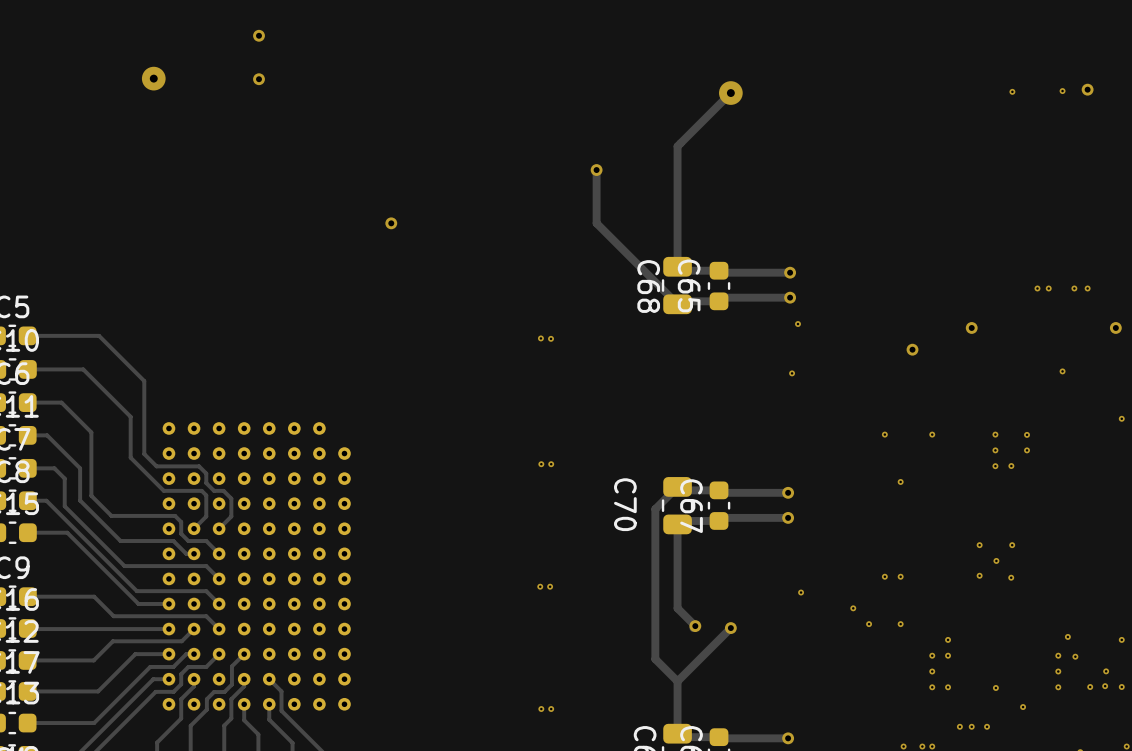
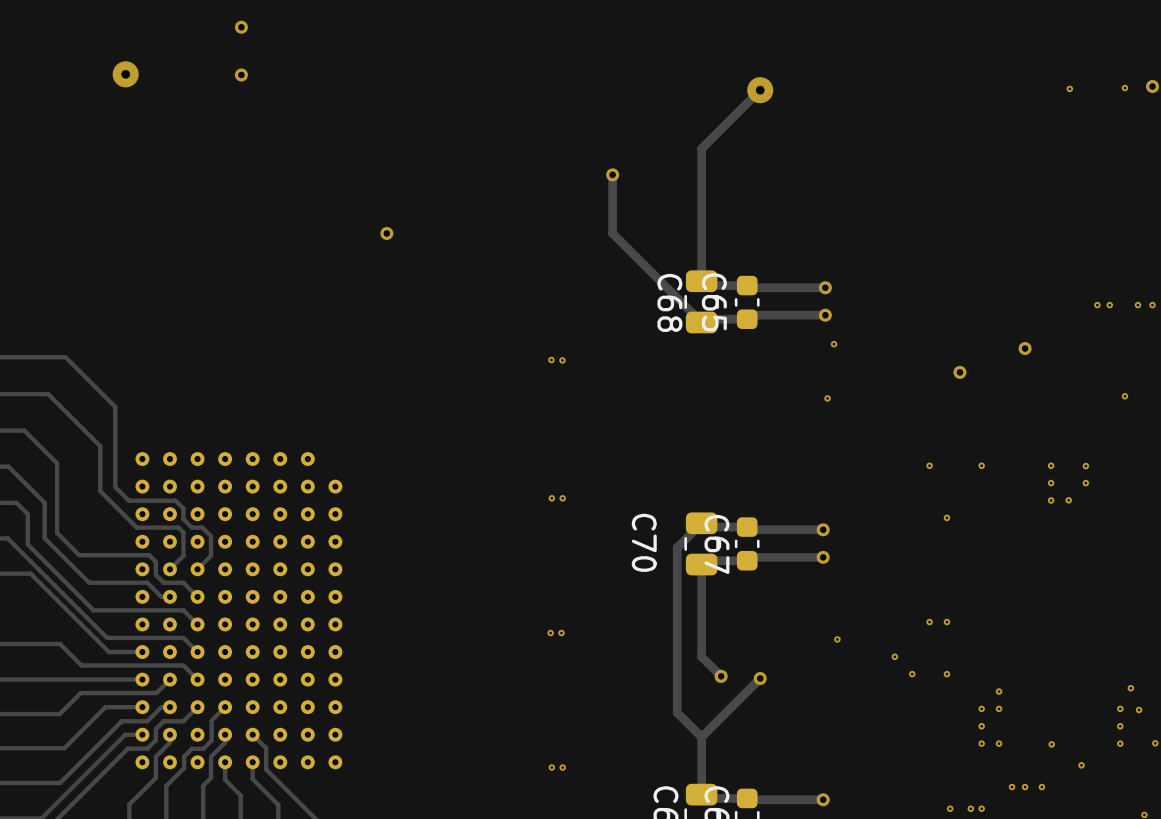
via: (979, 545) -> none
via: (1012, 545) -> none
via: (996, 560) -> none
via: (979, 575) -> none
via: (1011, 577) -> none

